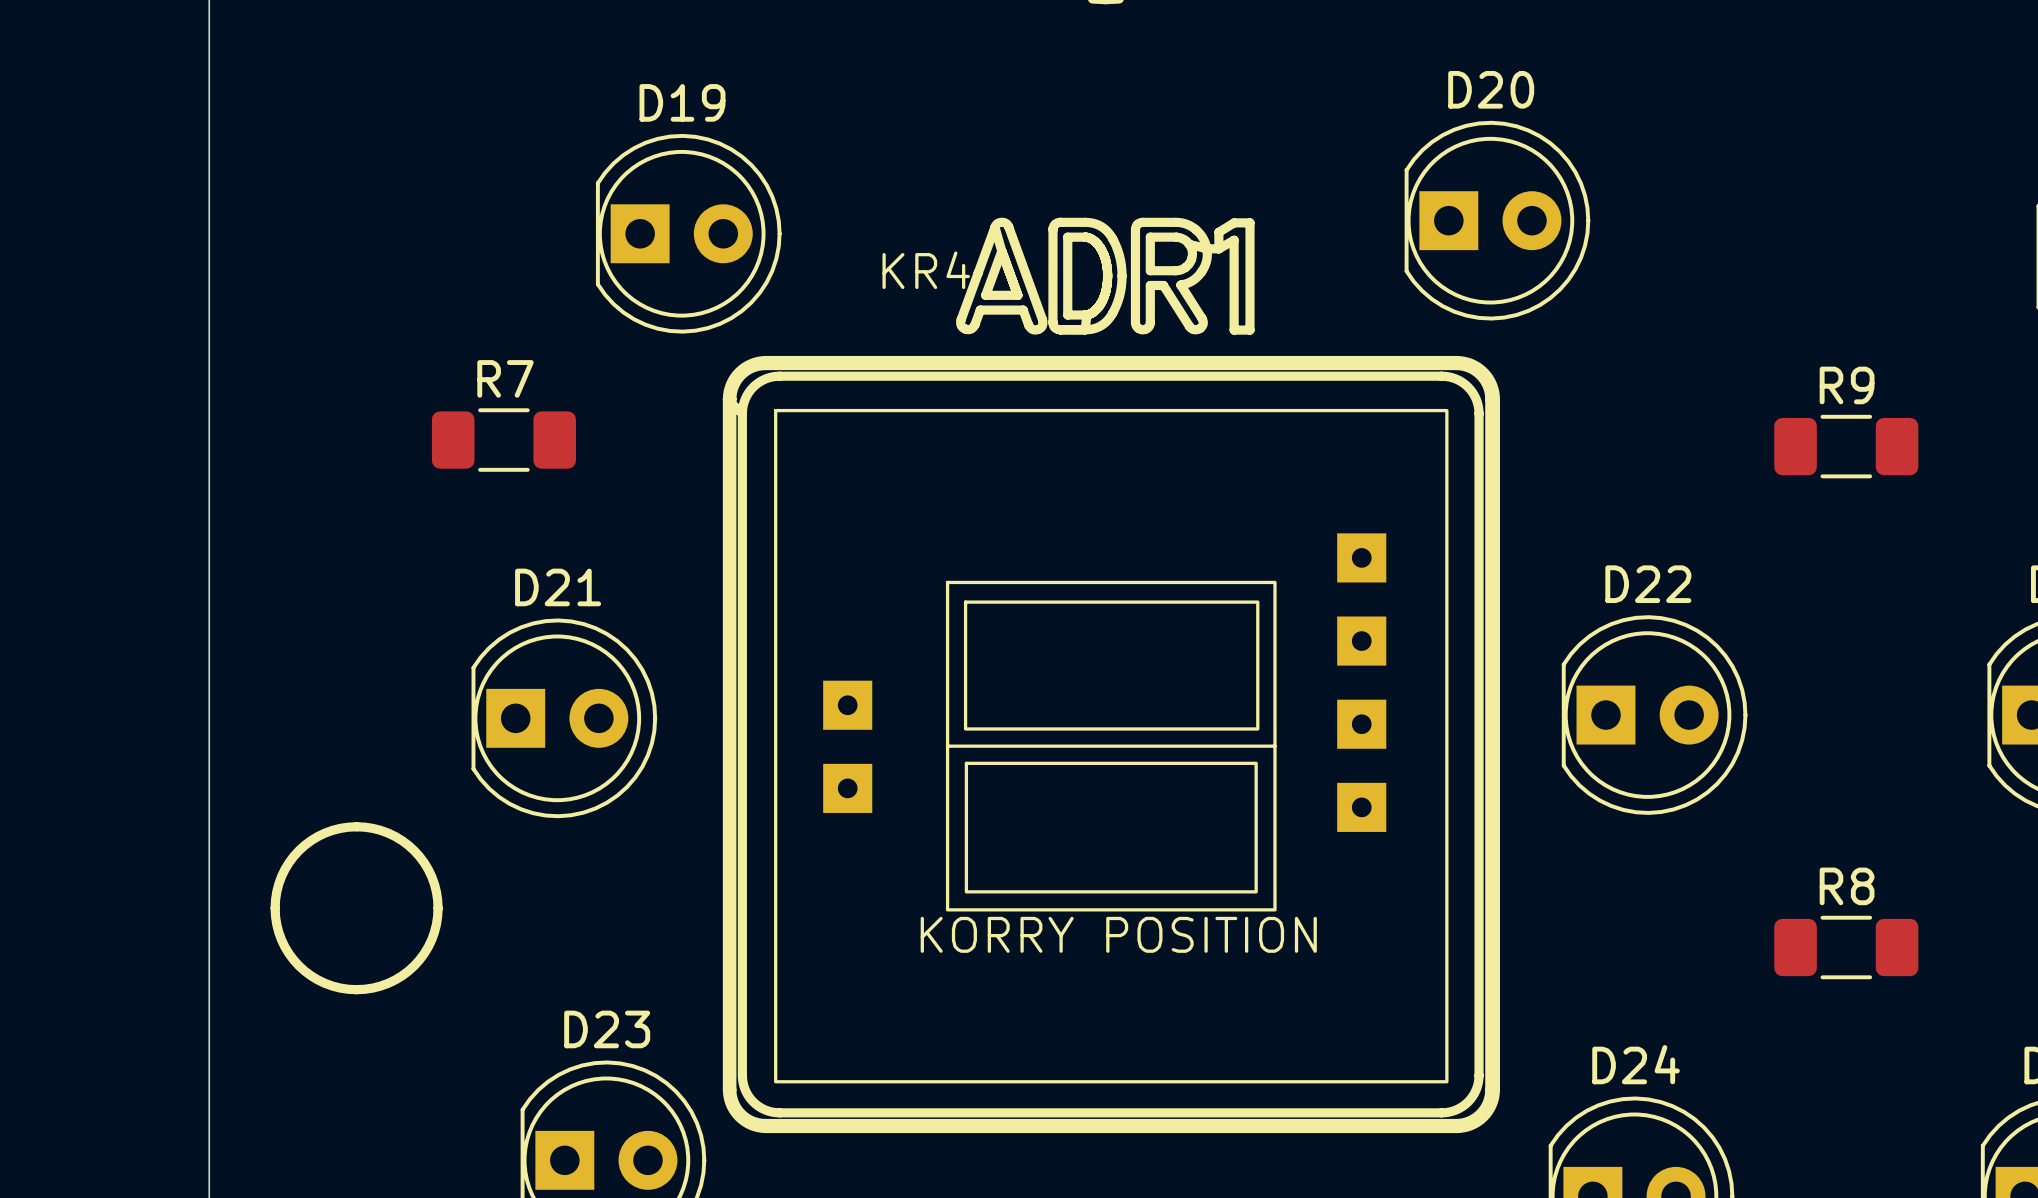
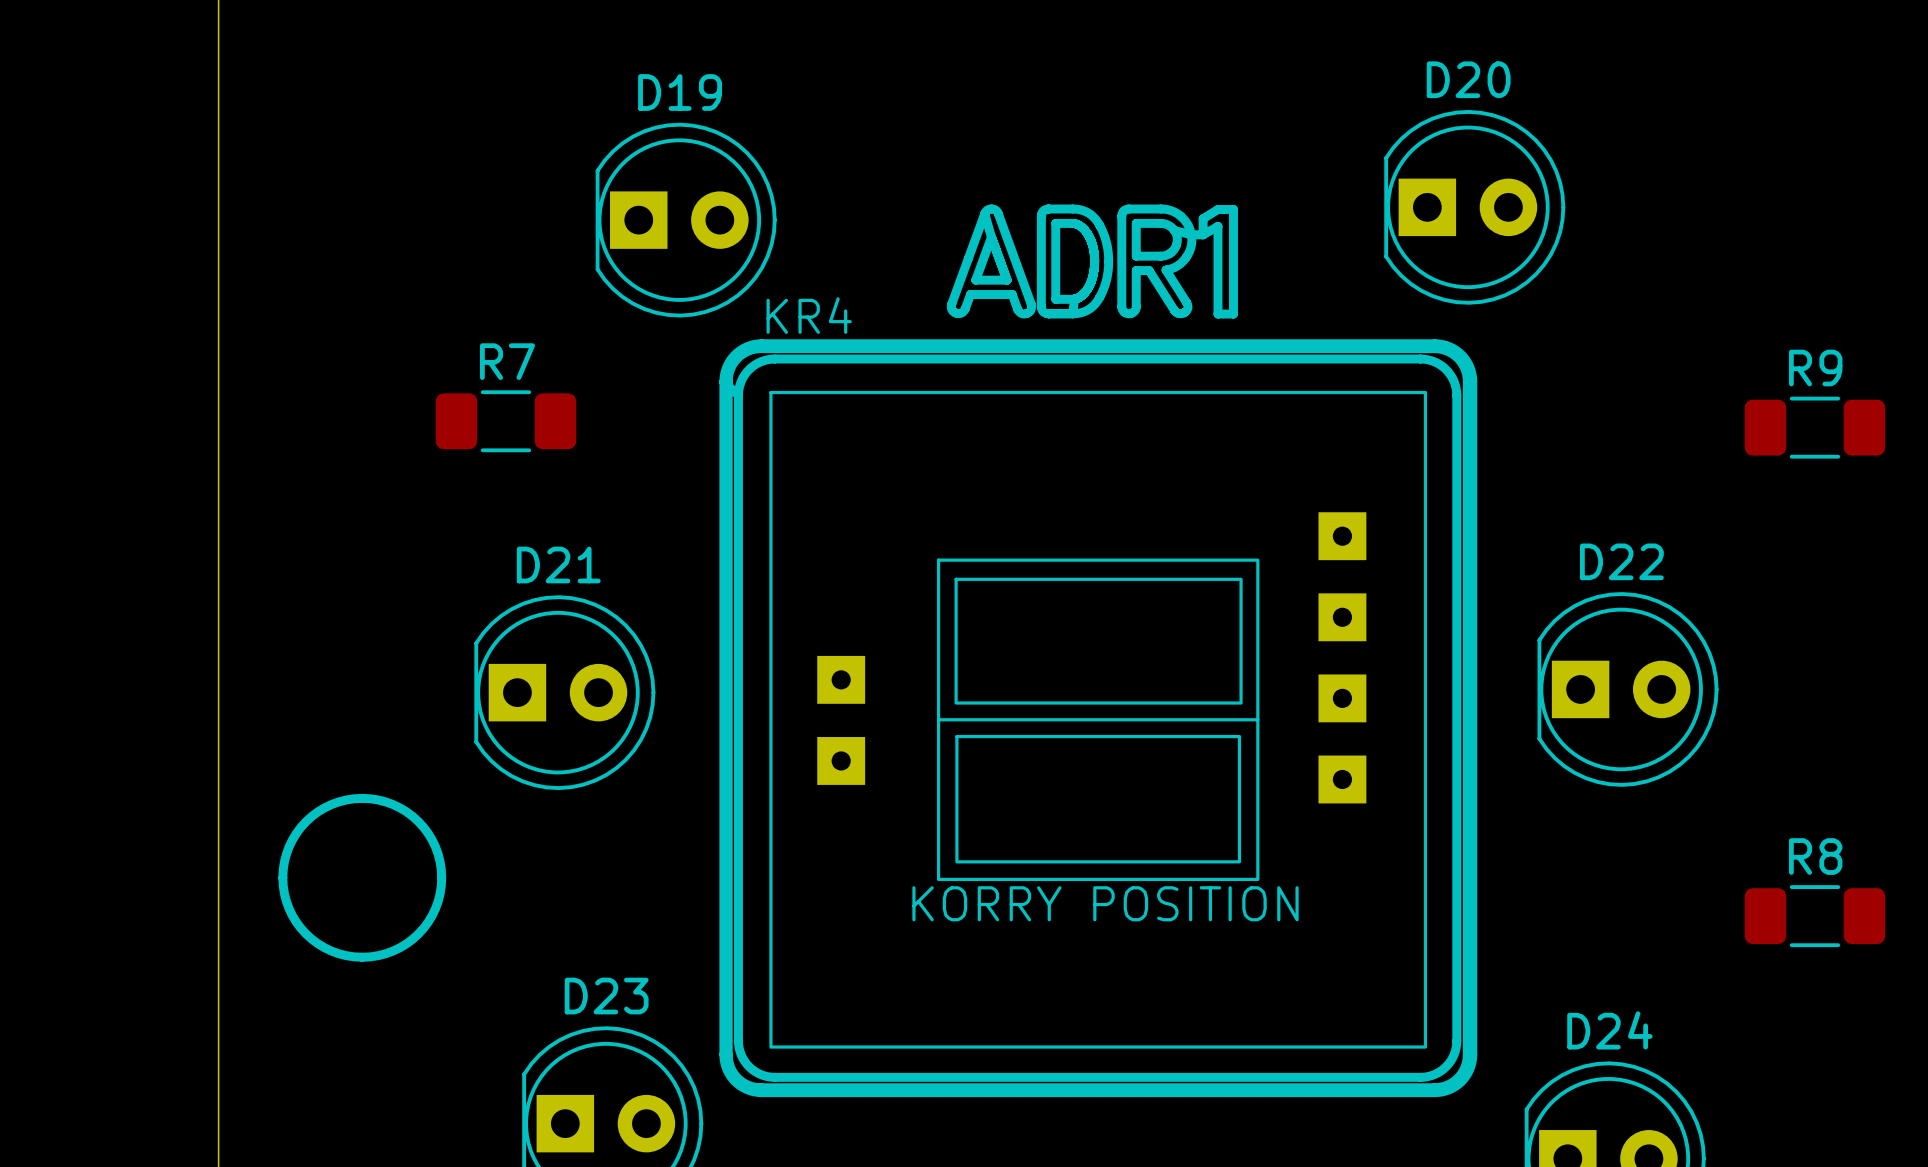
KR4 name position: KR4 (926, 270) -> KR4 (809, 315)

